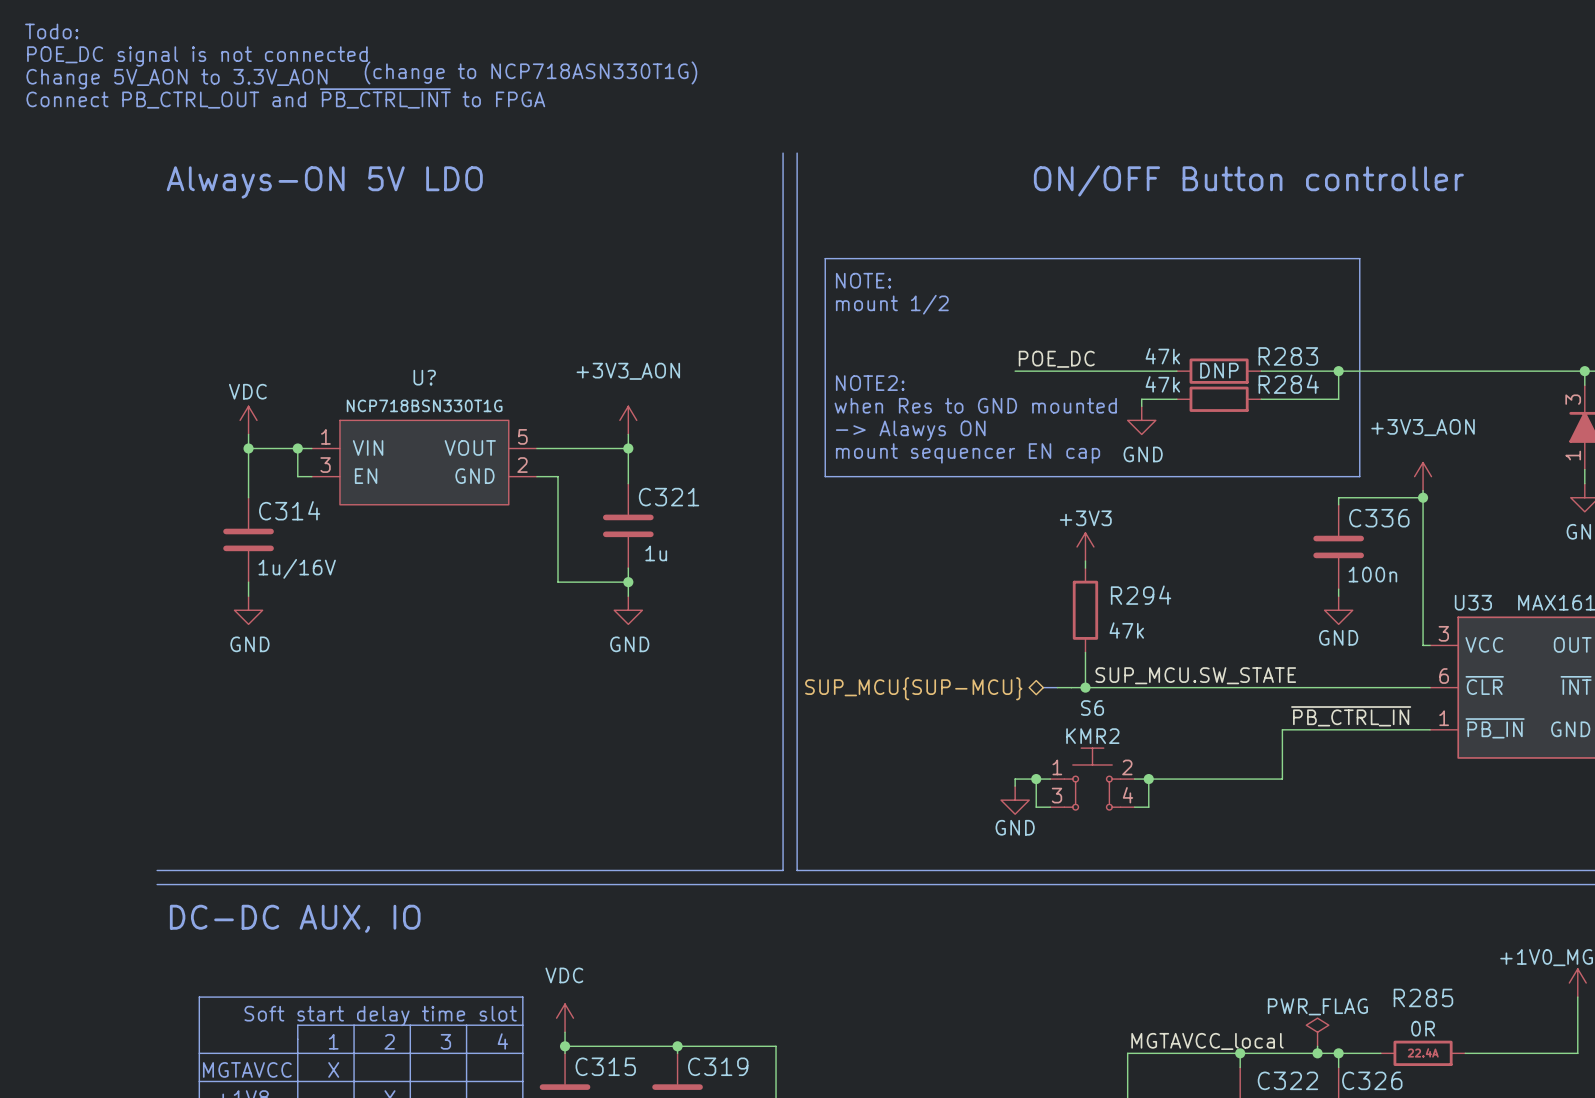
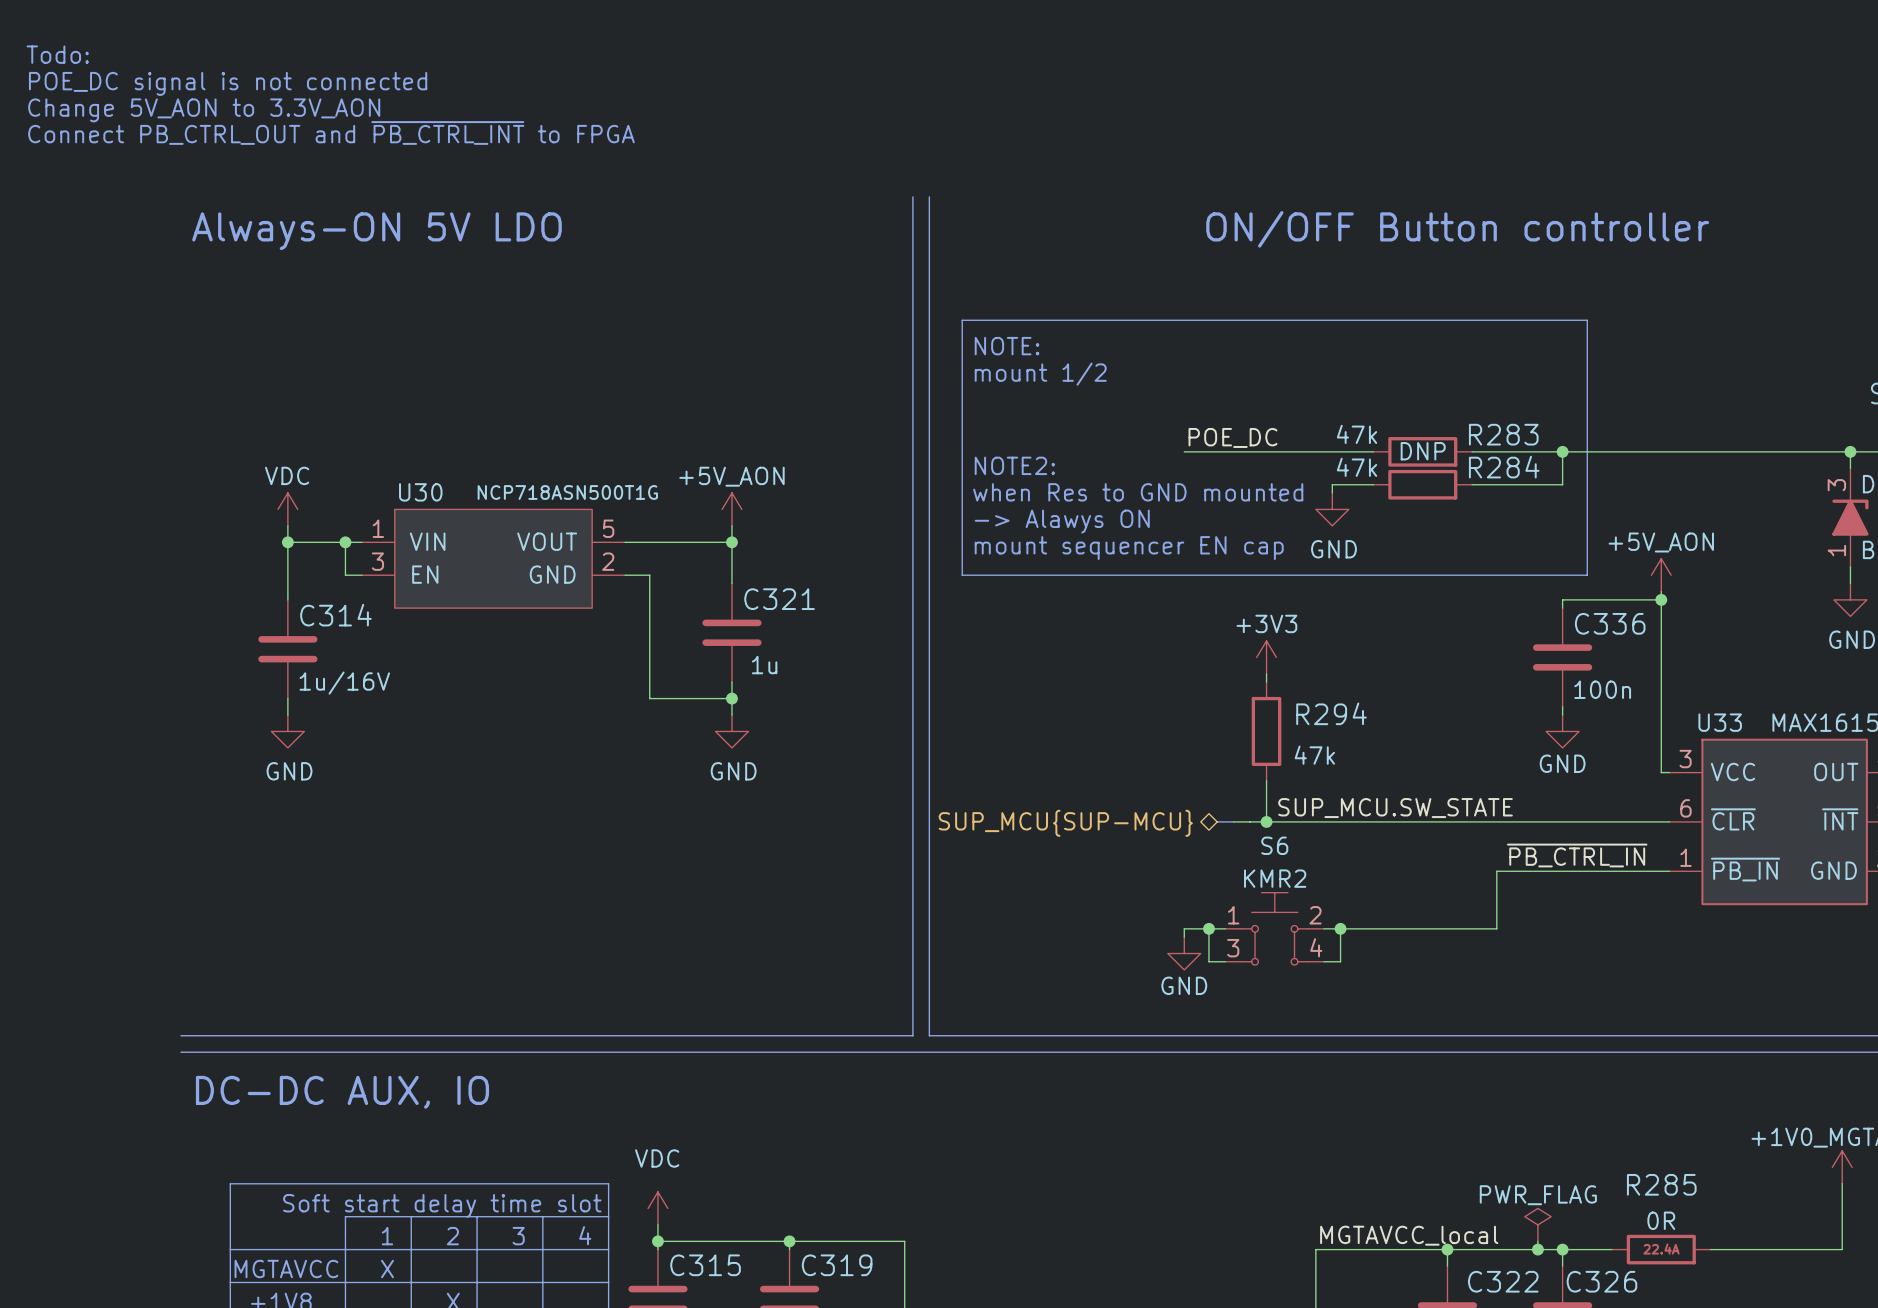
text: (change to NCP718ASN330T1G) (530, 72) -> none
U? name: U? (424, 377) -> U30 (420, 492)
U? value: NCP718BSN330T1G (424, 405) -> NCP718ASN500T1G (567, 492)
power symbol: +3V3_AON (628, 420) -> +5V_AON (731, 509)
power symbol: +3V3_AON (1423, 476) -> +5V_AON (1661, 575)

